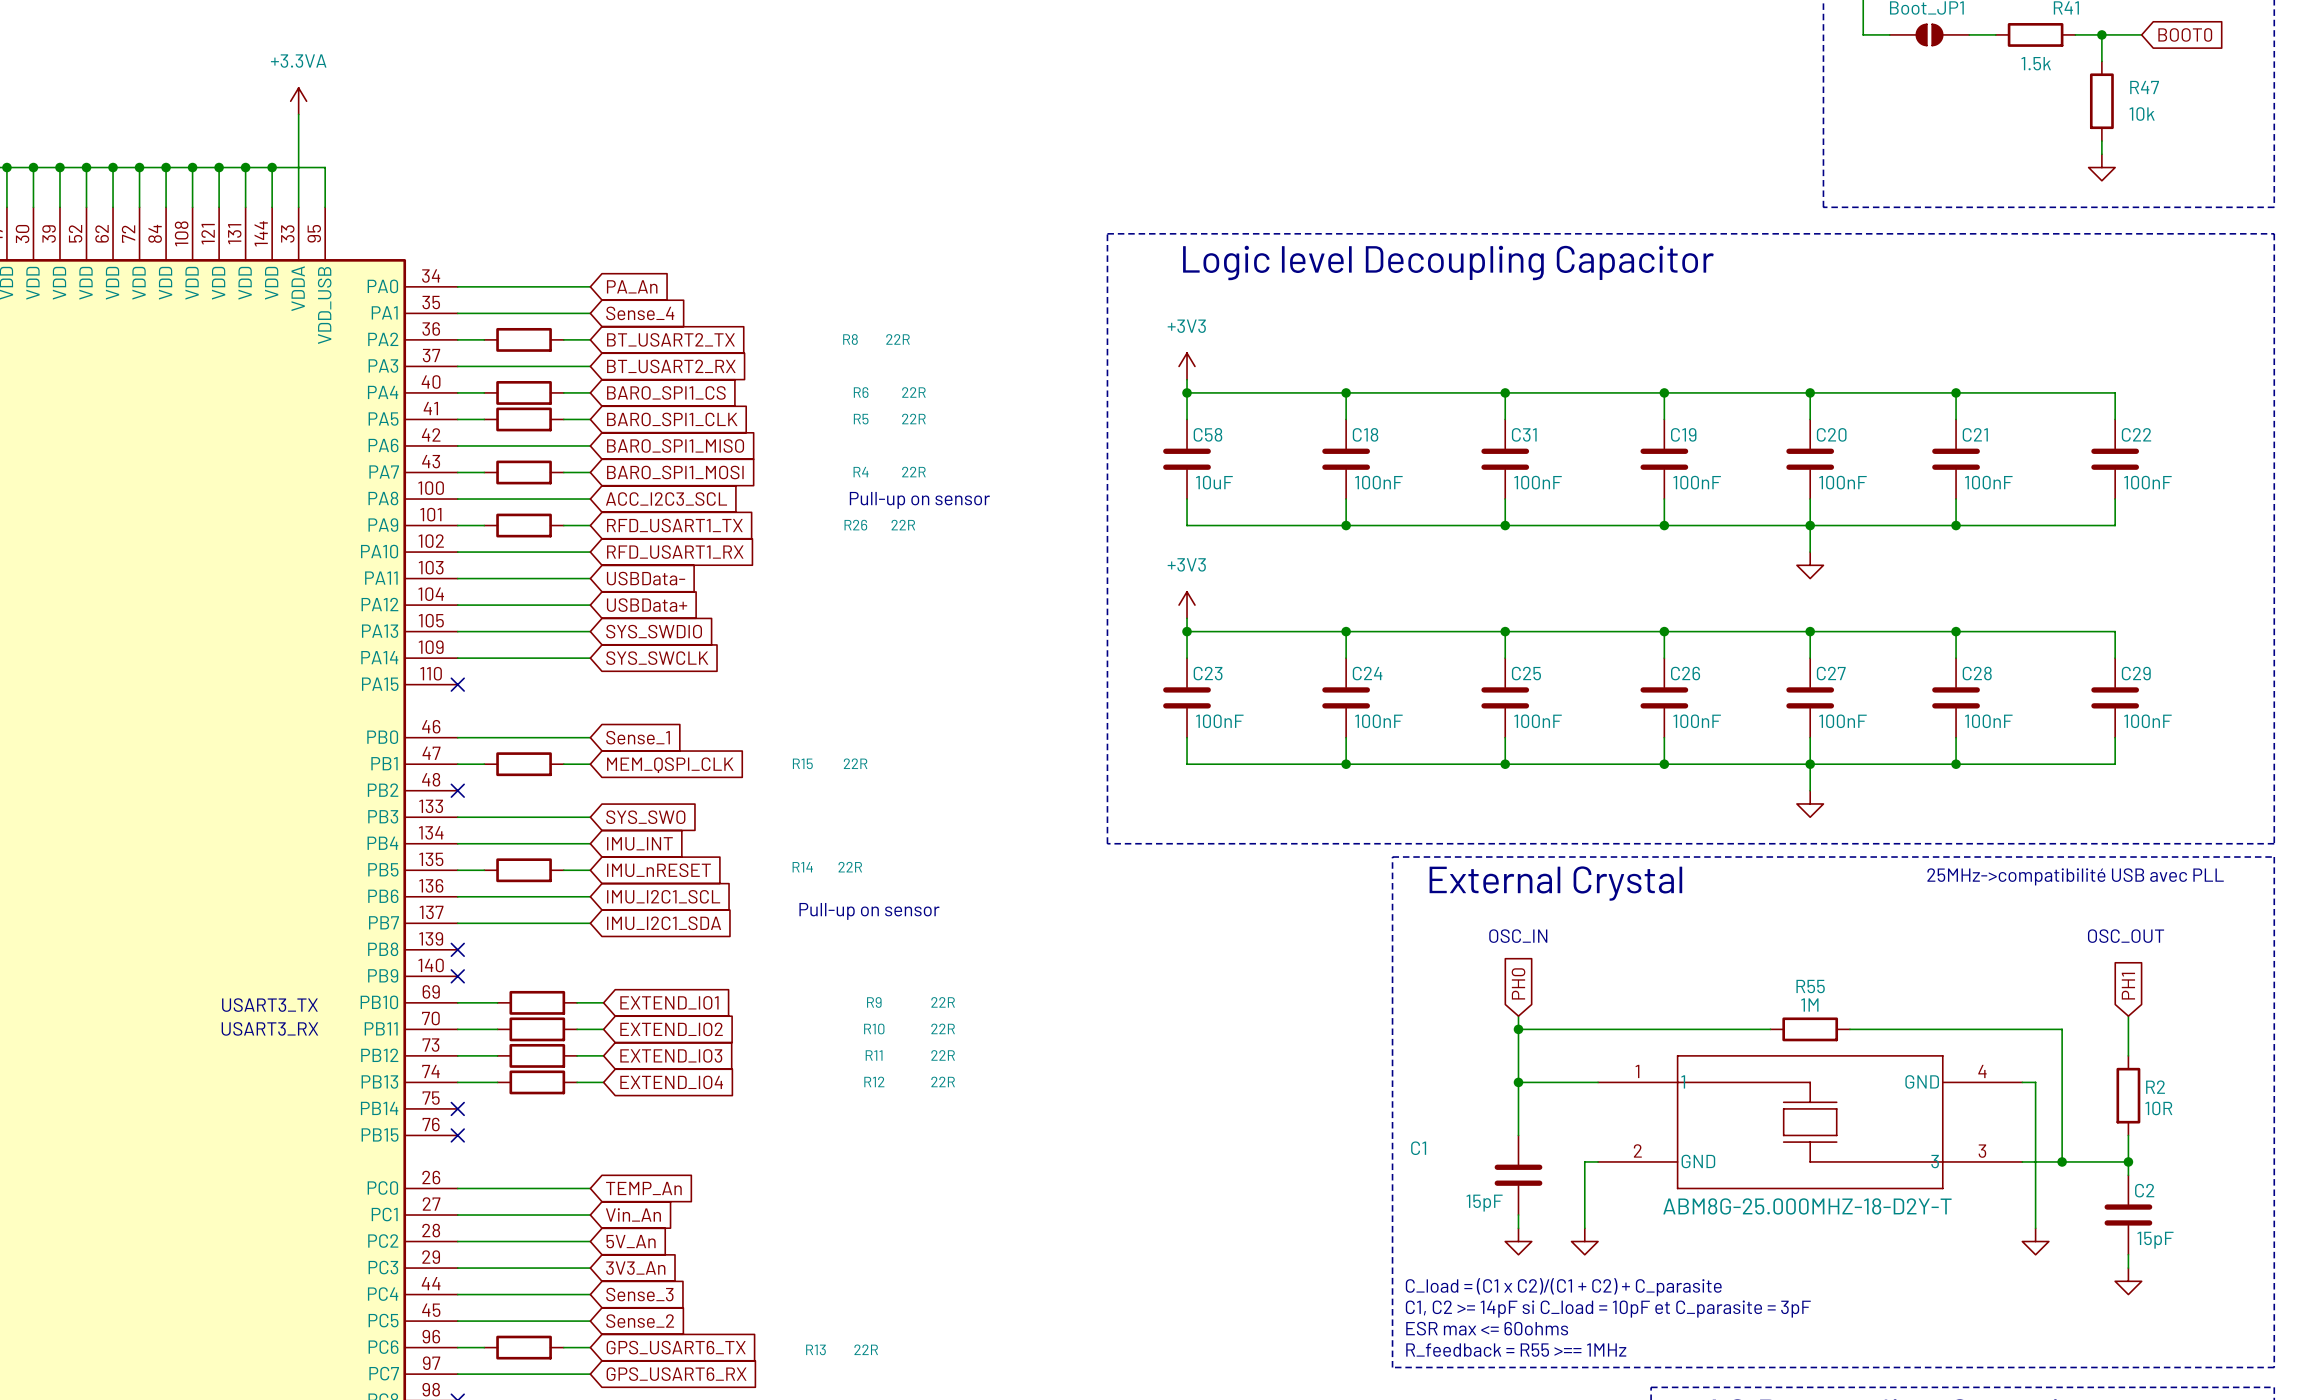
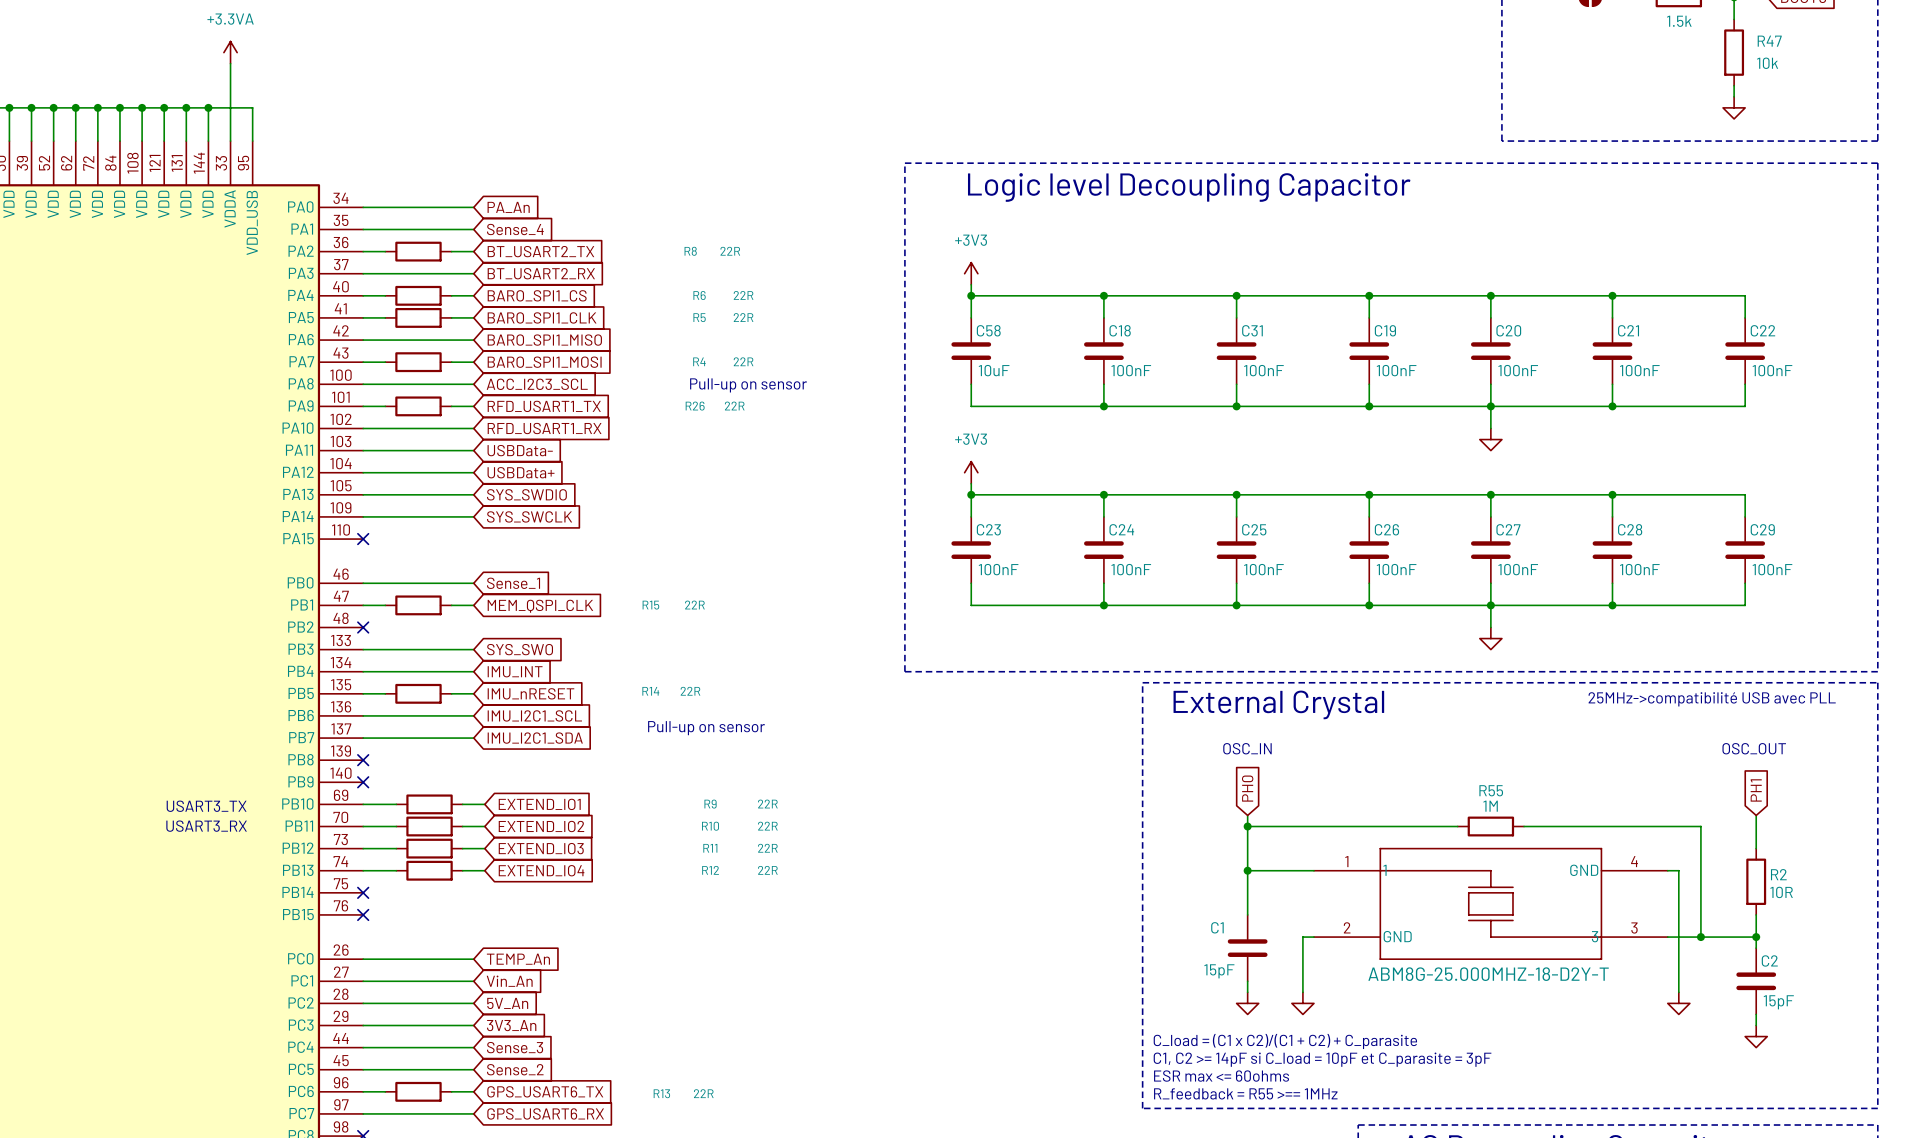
C1 name position: C1 (1418, 1148) -> C1 (1217, 927)

